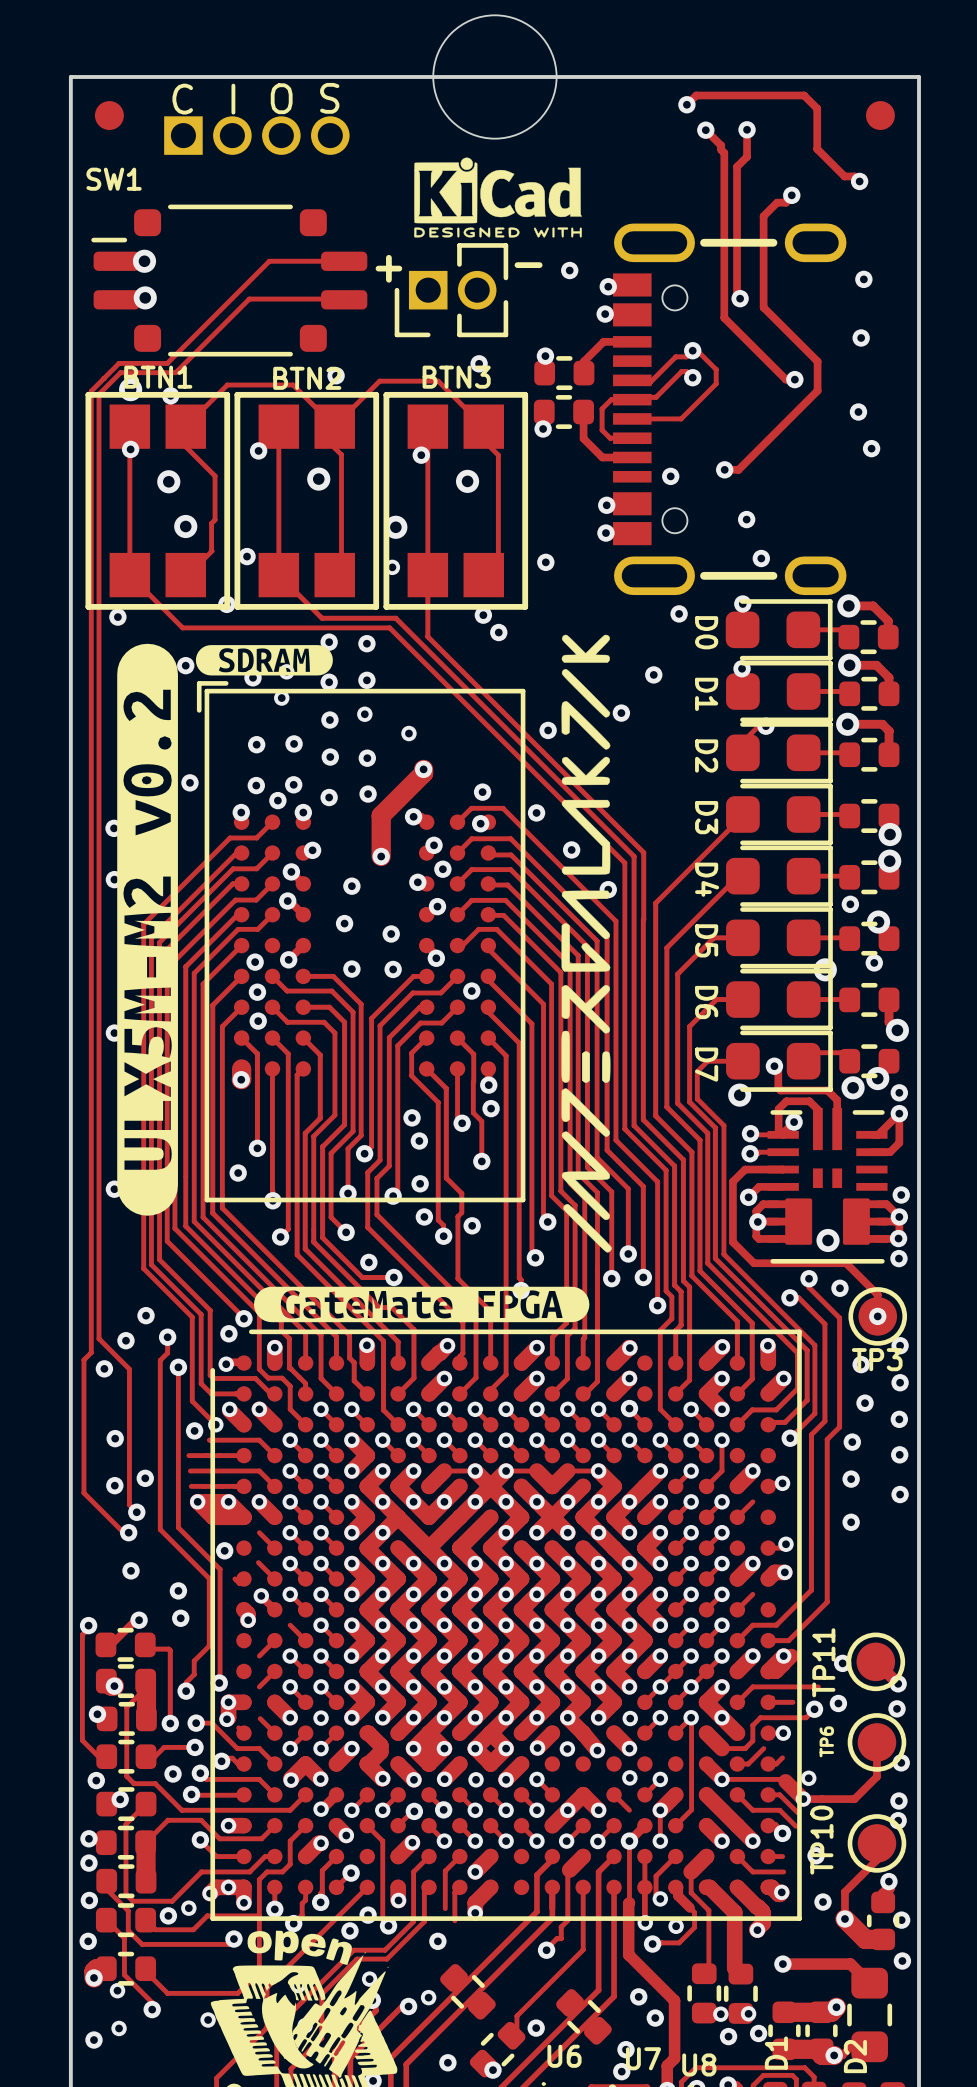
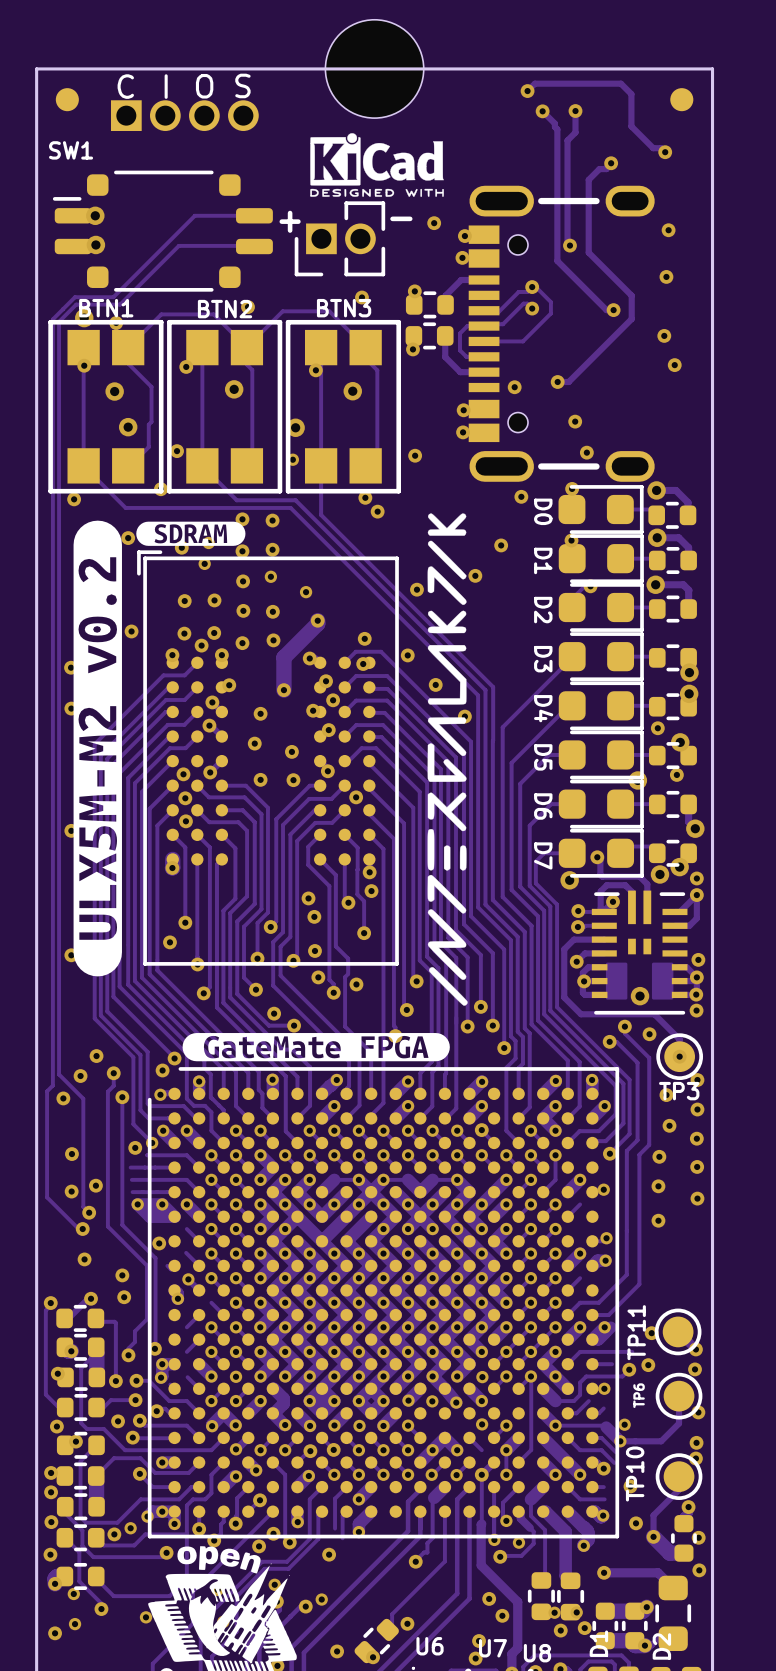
part: (467, 1991) -> none
part: (583, 2016) -> none

